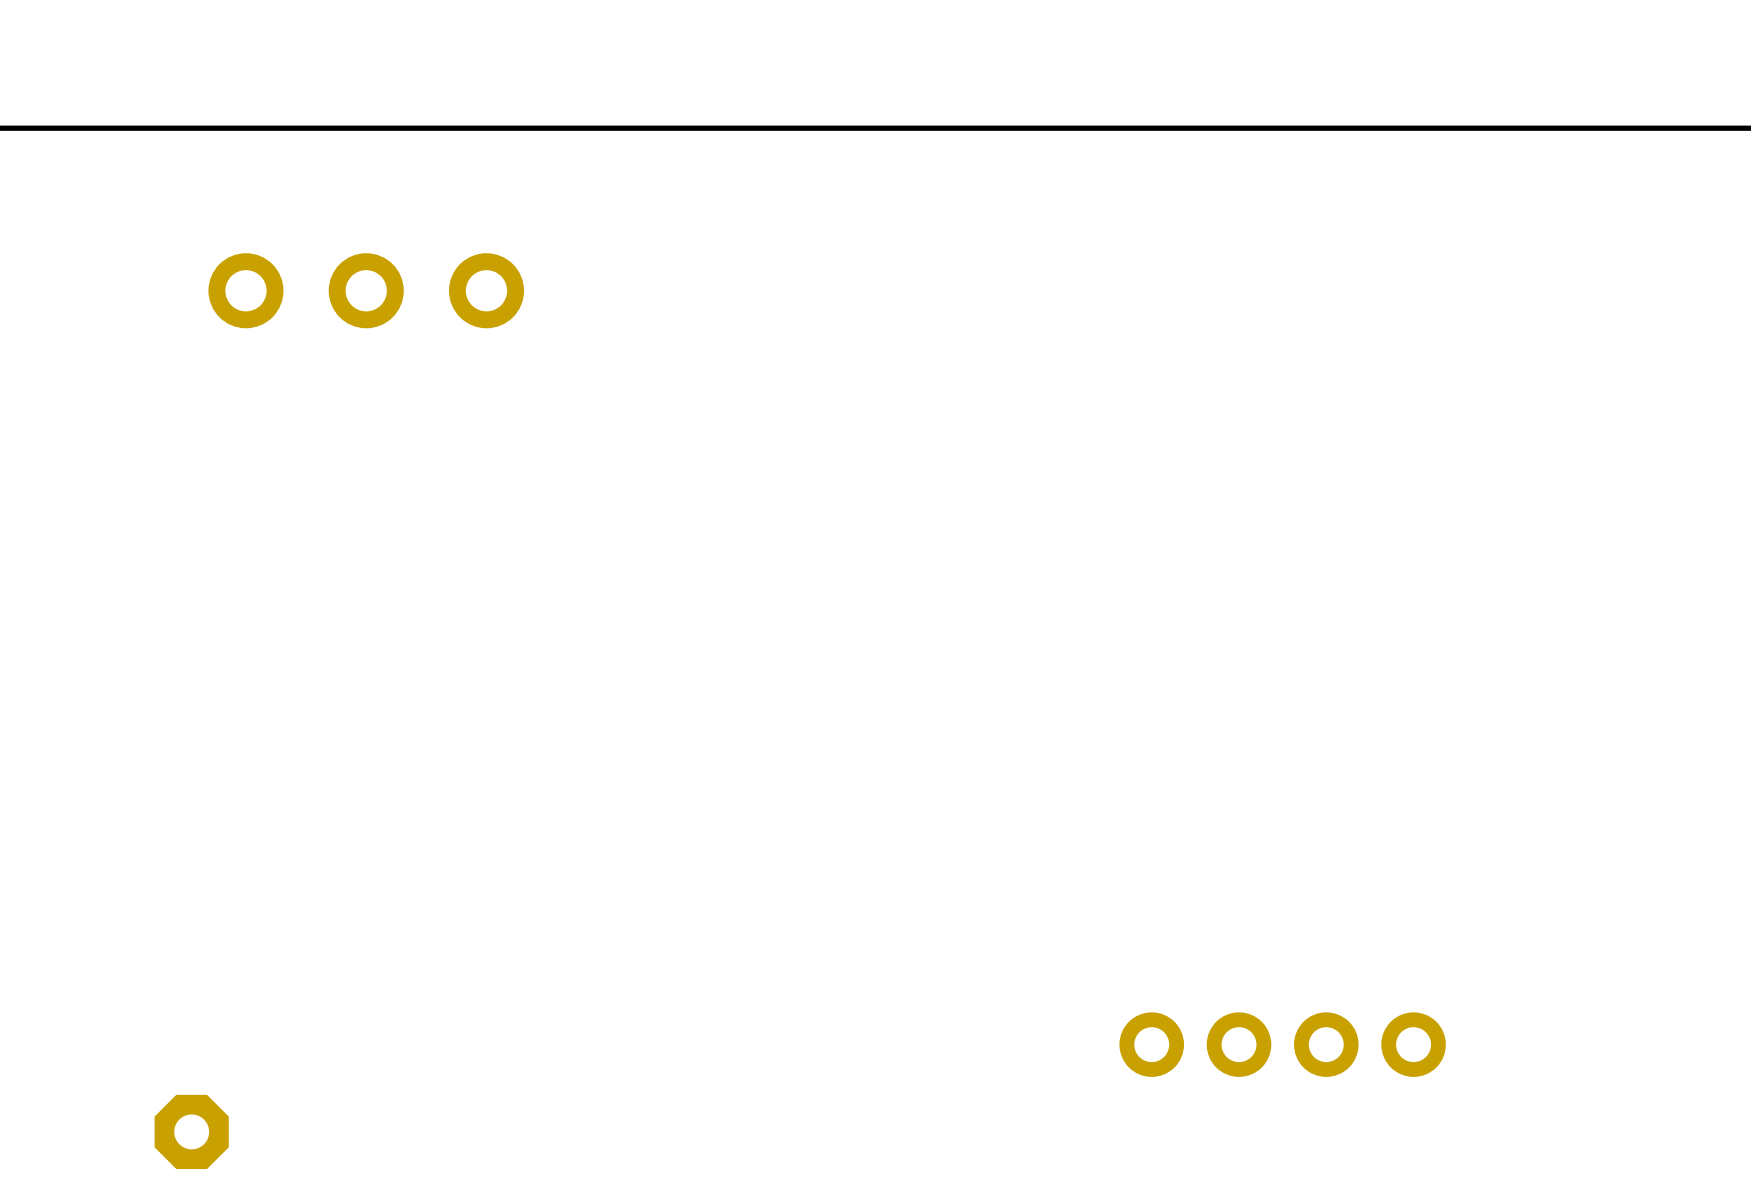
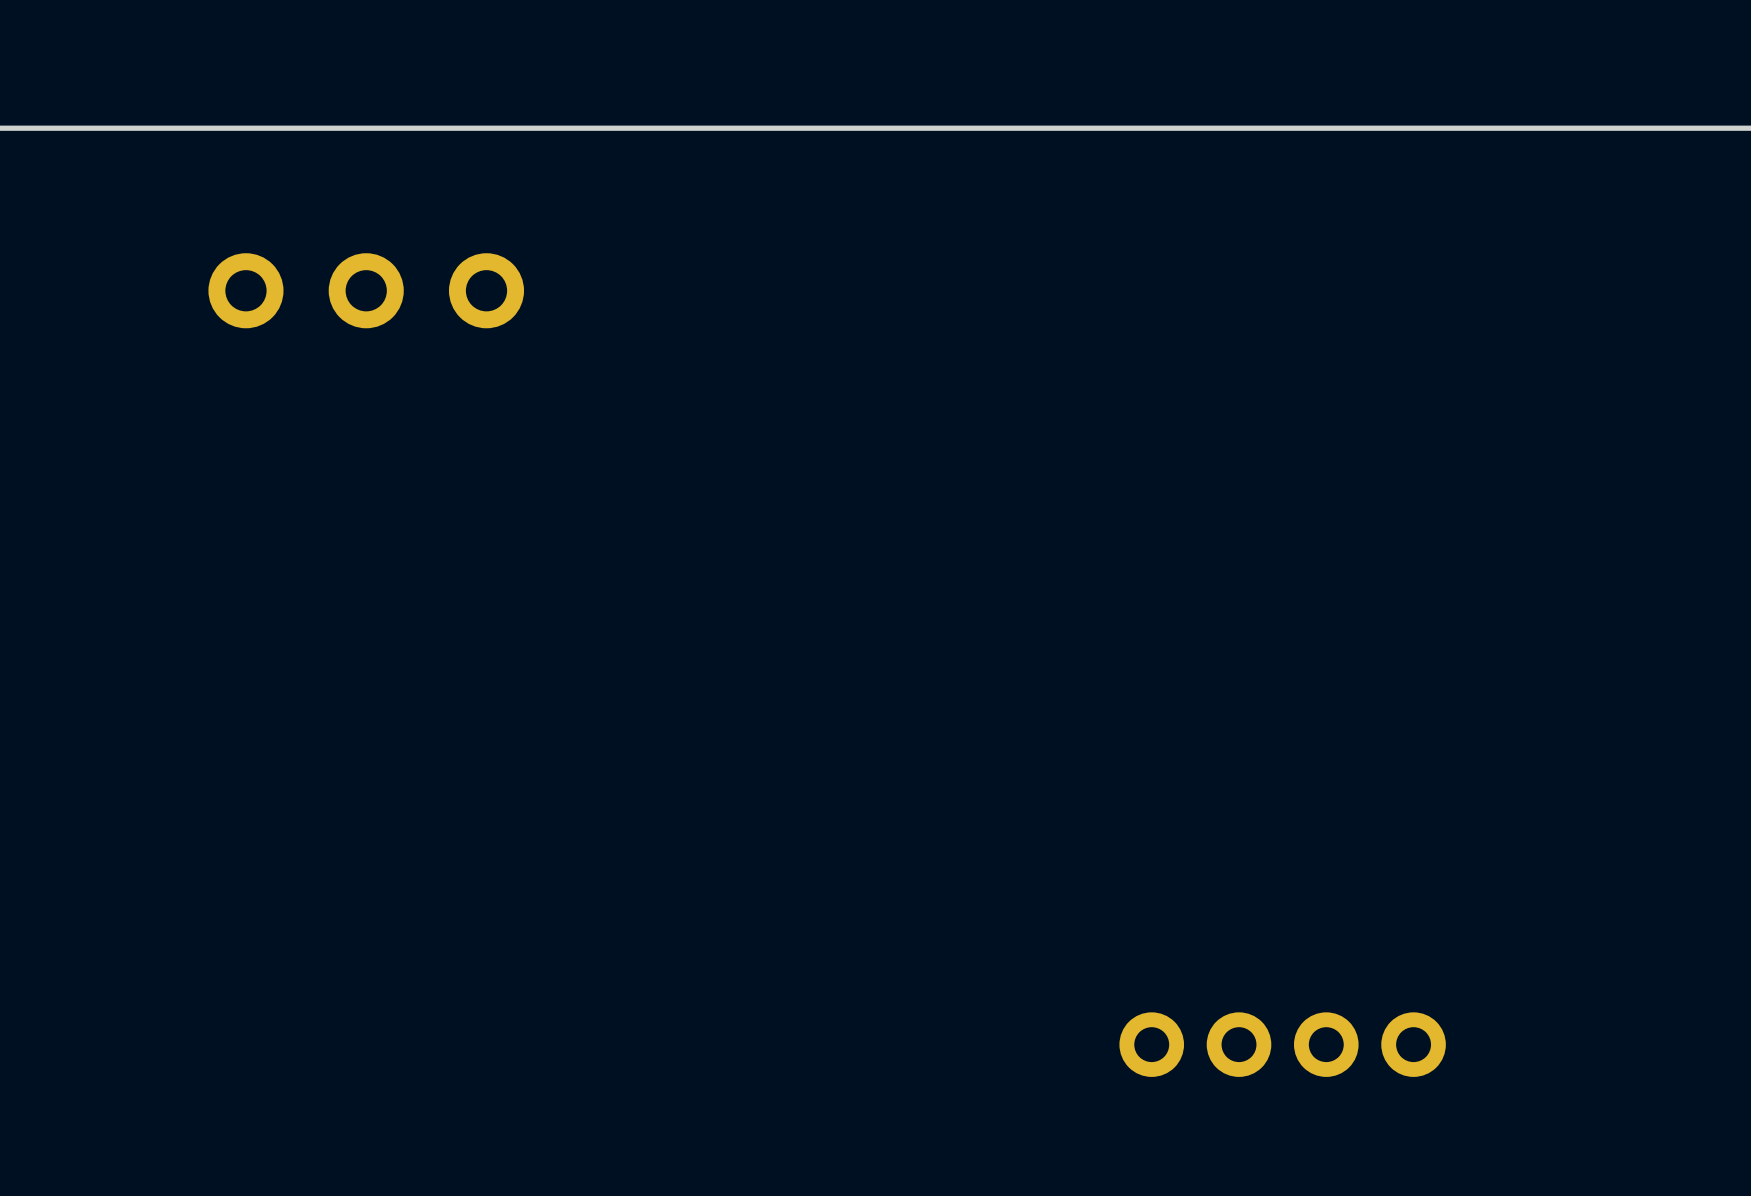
part: (191, 1131) -> none

